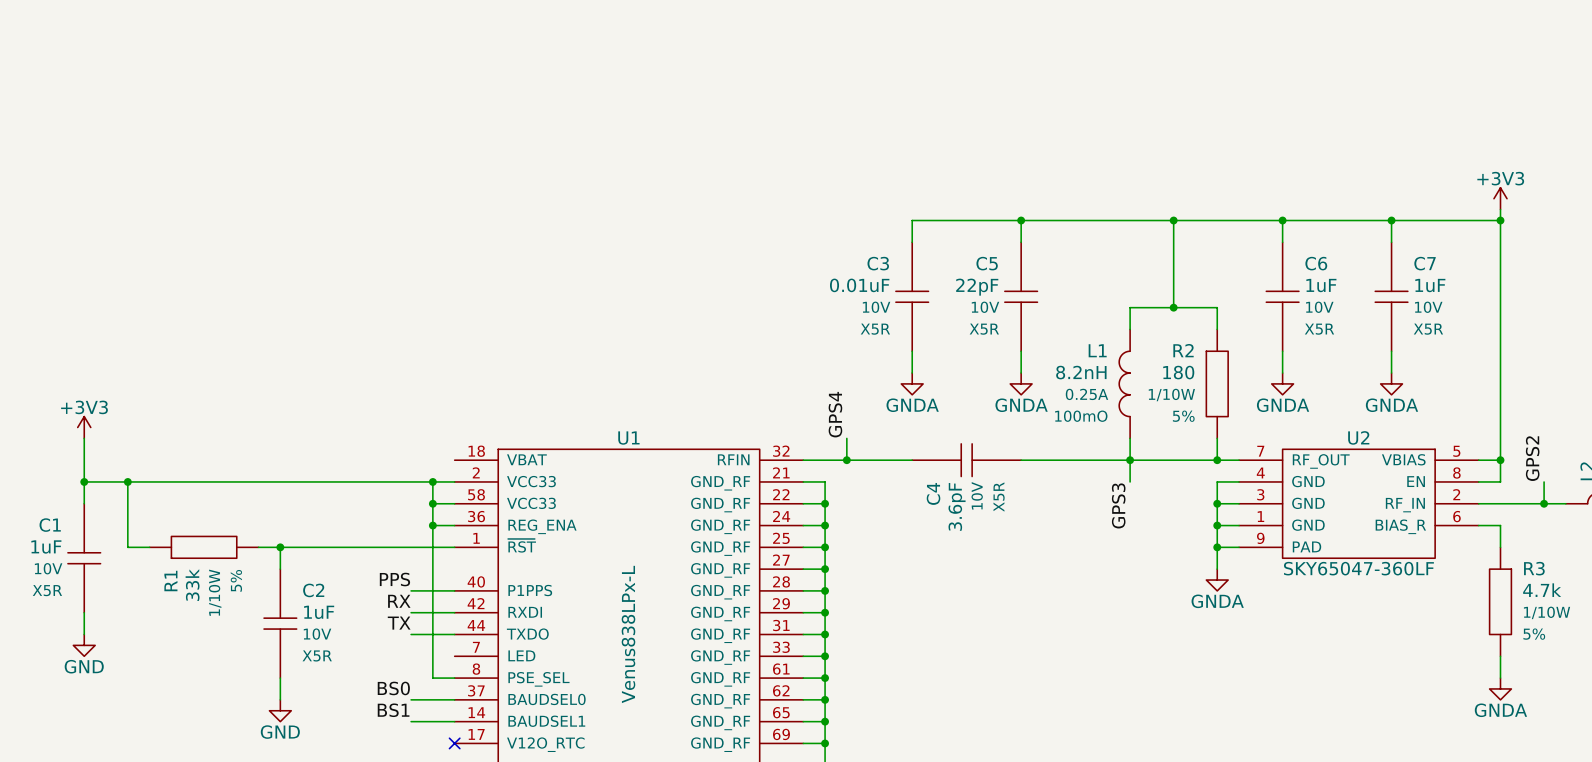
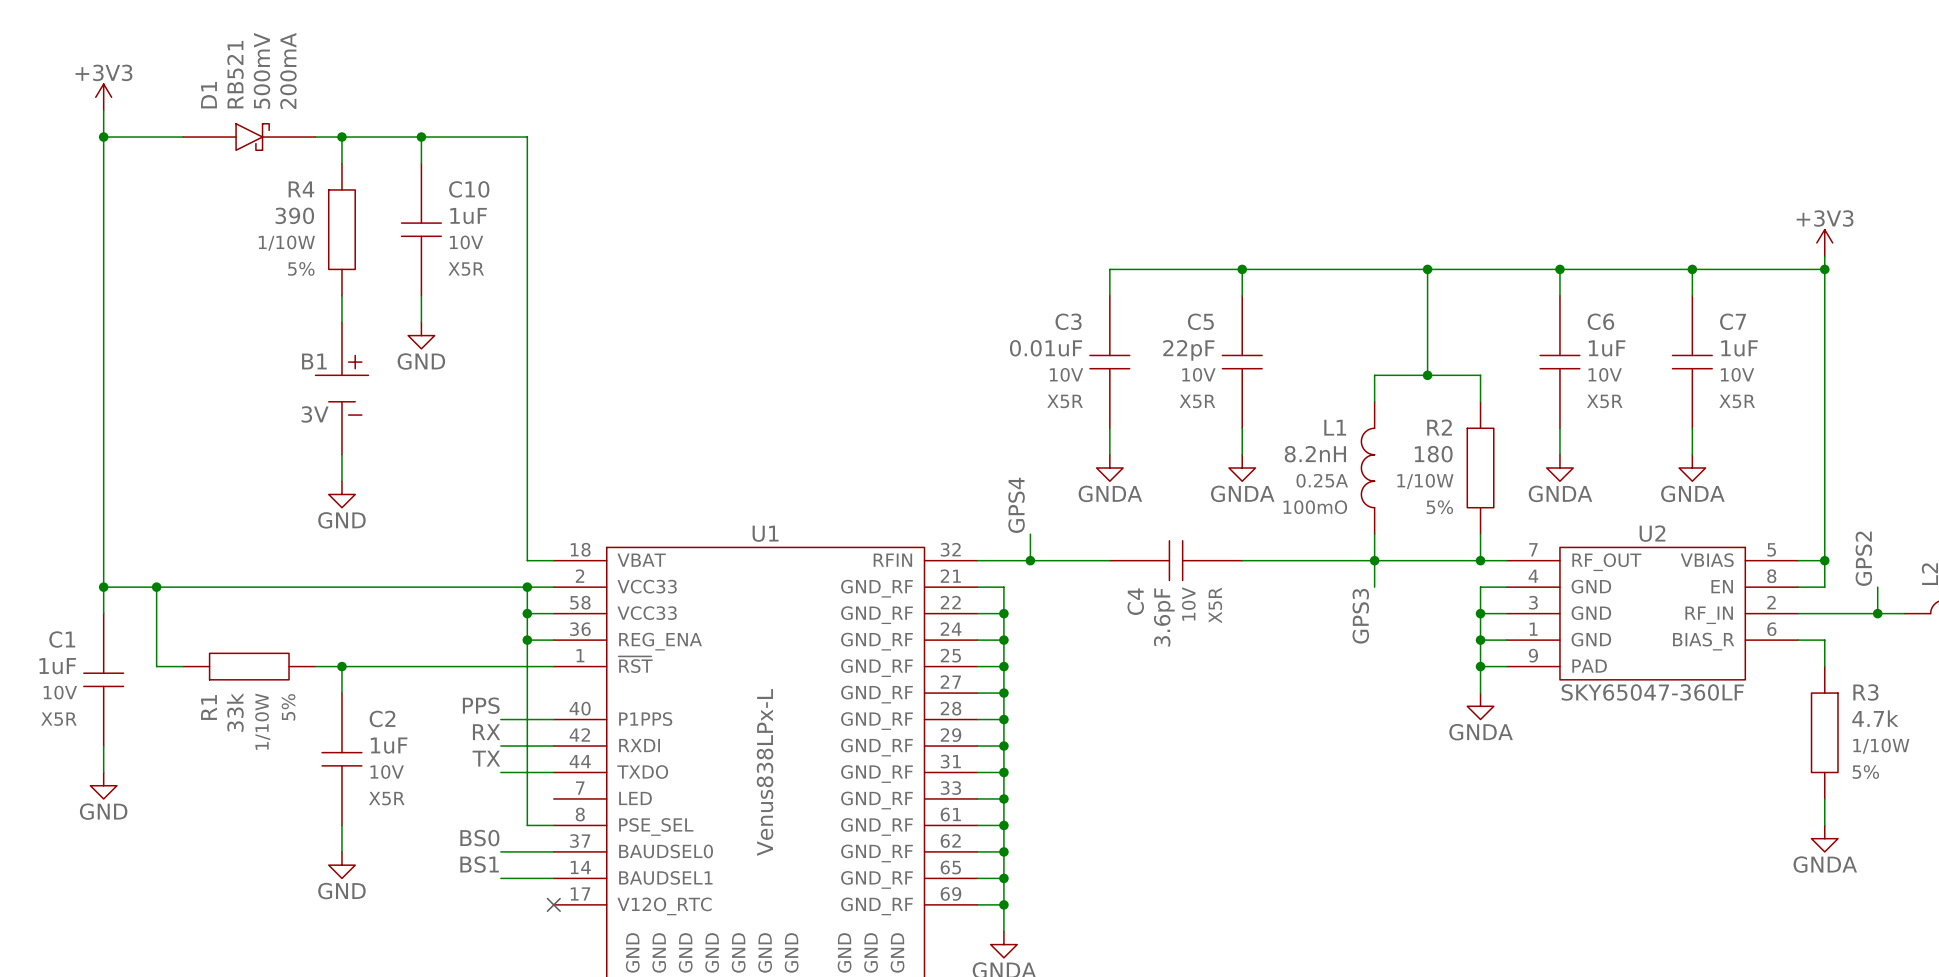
power symbol: none -> +3V3 (103, 97)
wire: none -> (103, 110) (103, 534)
wire: none -> (103, 137) (183, 137)
junction: none -> (103, 137)
D1: none -> RB521 (249, 137)
wire: none -> (315, 137) (527, 137) (527, 560) (553, 560)
wire: none -> (341, 137) (341, 163)
junction: none -> (341, 137)
wire: none -> (421, 137) (421, 163)
junction: none -> (421, 137)
R4: none -> 390 (341, 229)
C10: none -> 1uF (421, 229)
wire: none -> (341, 295) (341, 322)
wire: none -> (421, 295) (421, 322)
power symbol: none -> GND (421, 335)
B1: none -> 3V (341, 388)
wire: none -> (341, 454) (341, 481)
power symbol: none -> GND (341, 494)
power symbol: +3V3 (84, 427) -> none

